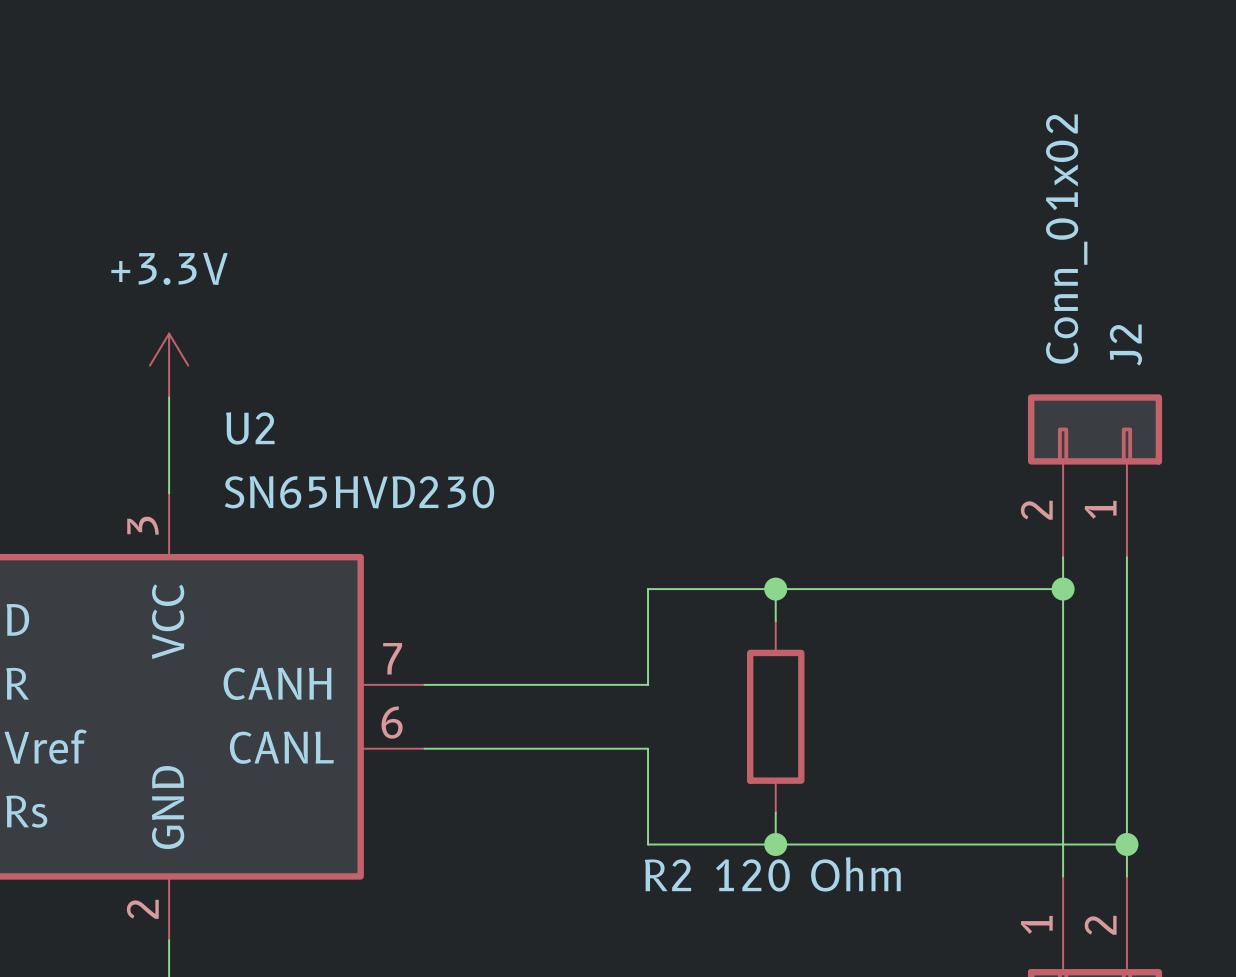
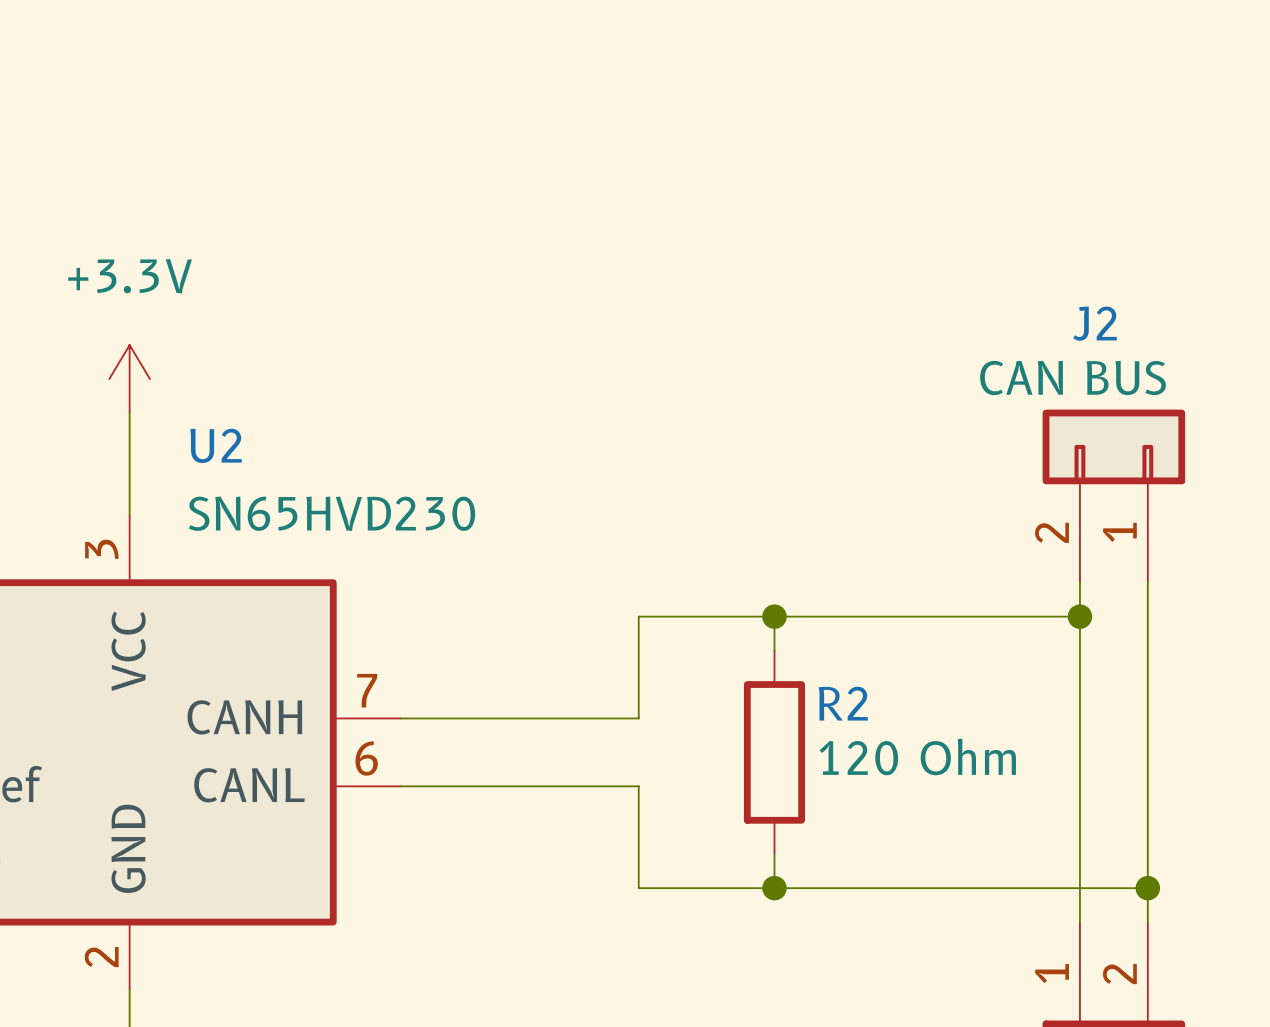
J2 value: Conn_01x02 (1066, 239) -> CAN BUS (1073, 377)
J2 name rotation: 0° (1125, 345) -> 90° clockwise (1095, 323)
R2 value position: 120 Ohm (808, 874) -> 120 Ohm (917, 756)
R2 name position: R2 (668, 875) -> R2 (843, 703)

